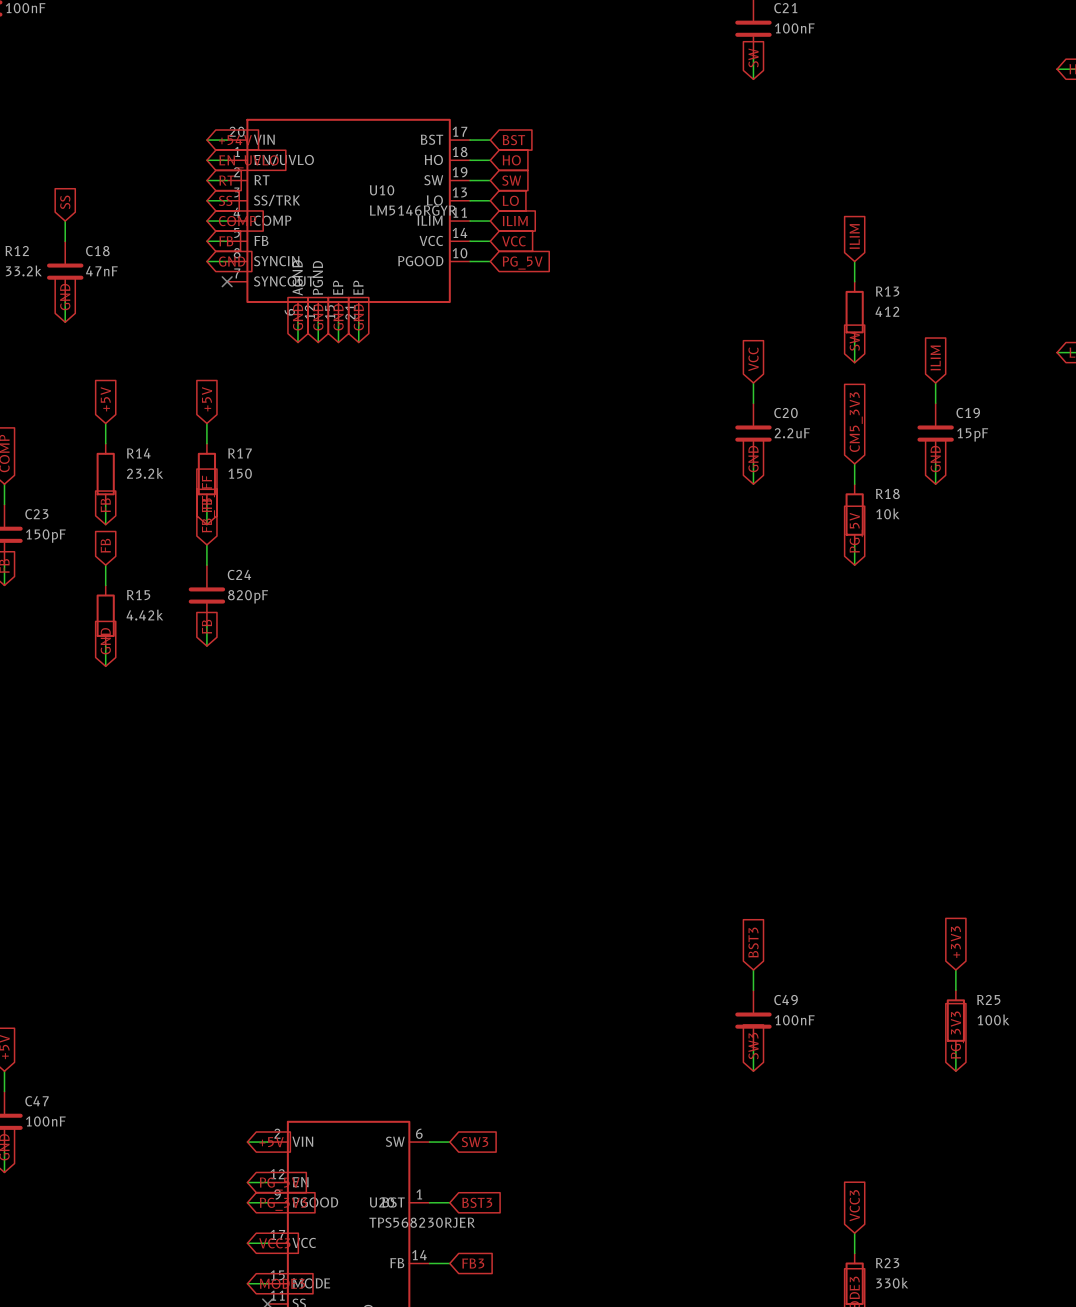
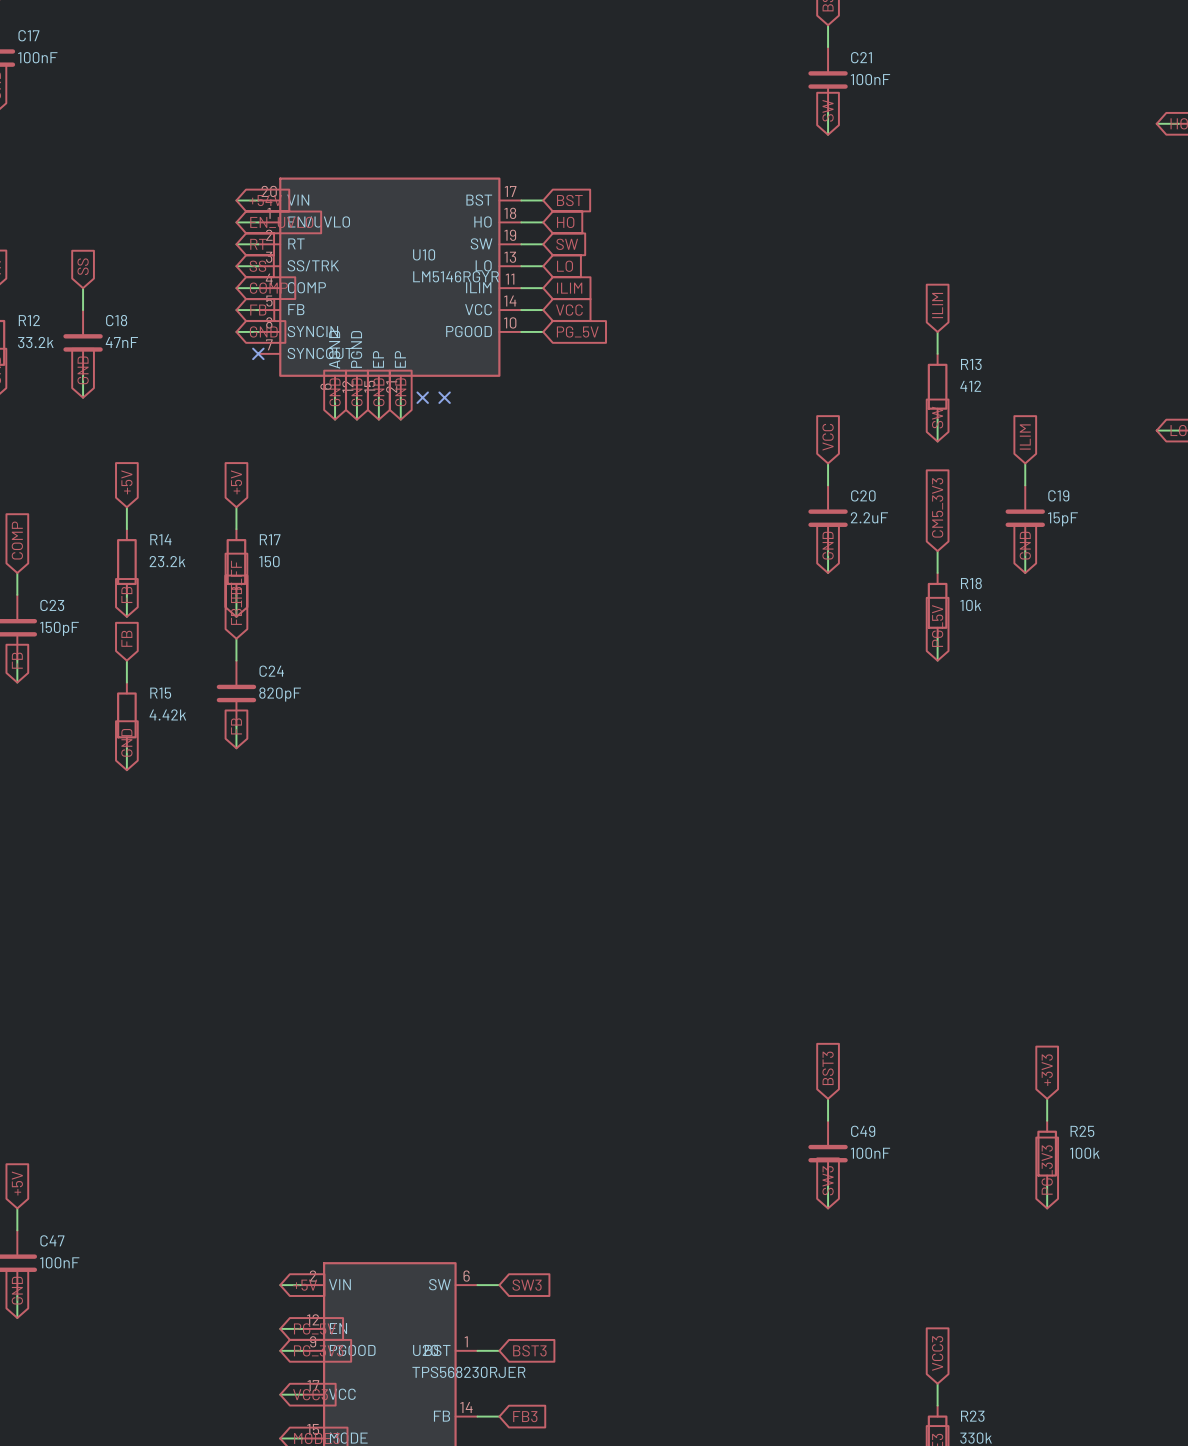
no-connect mark: none -> (422, 397)
no-connect mark: none -> (444, 397)

